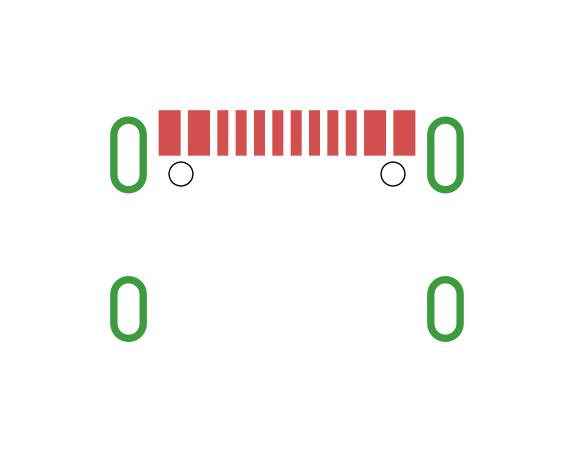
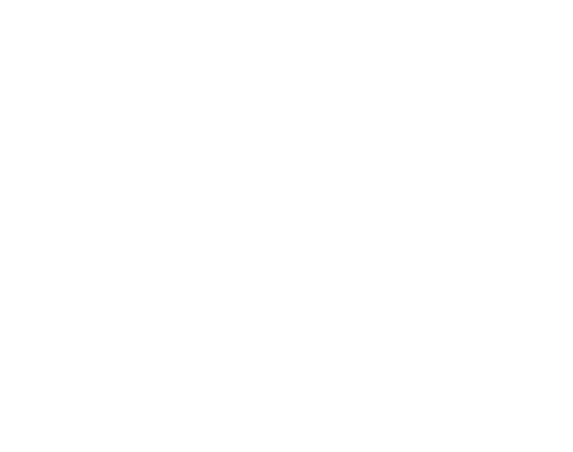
part: (287, 226) -> none

